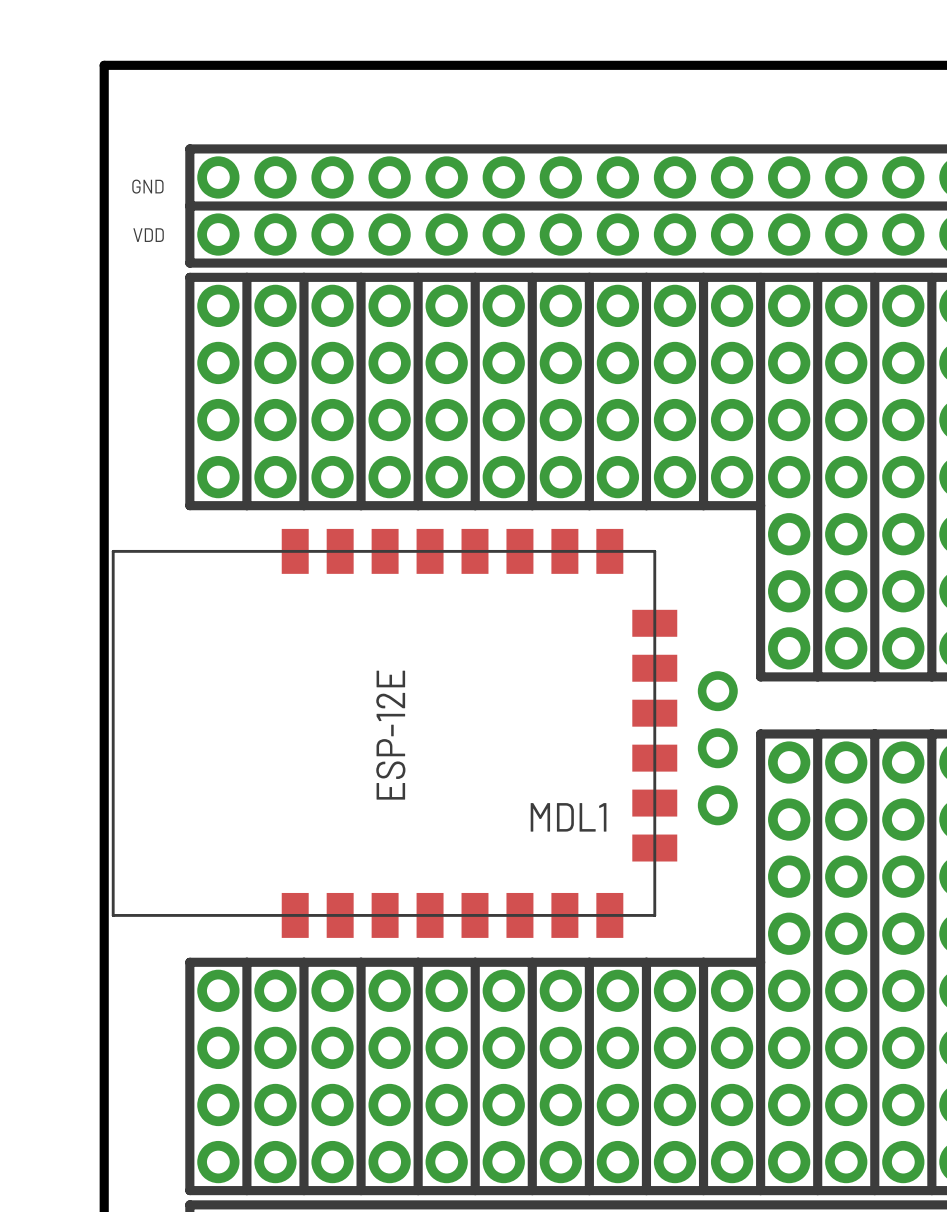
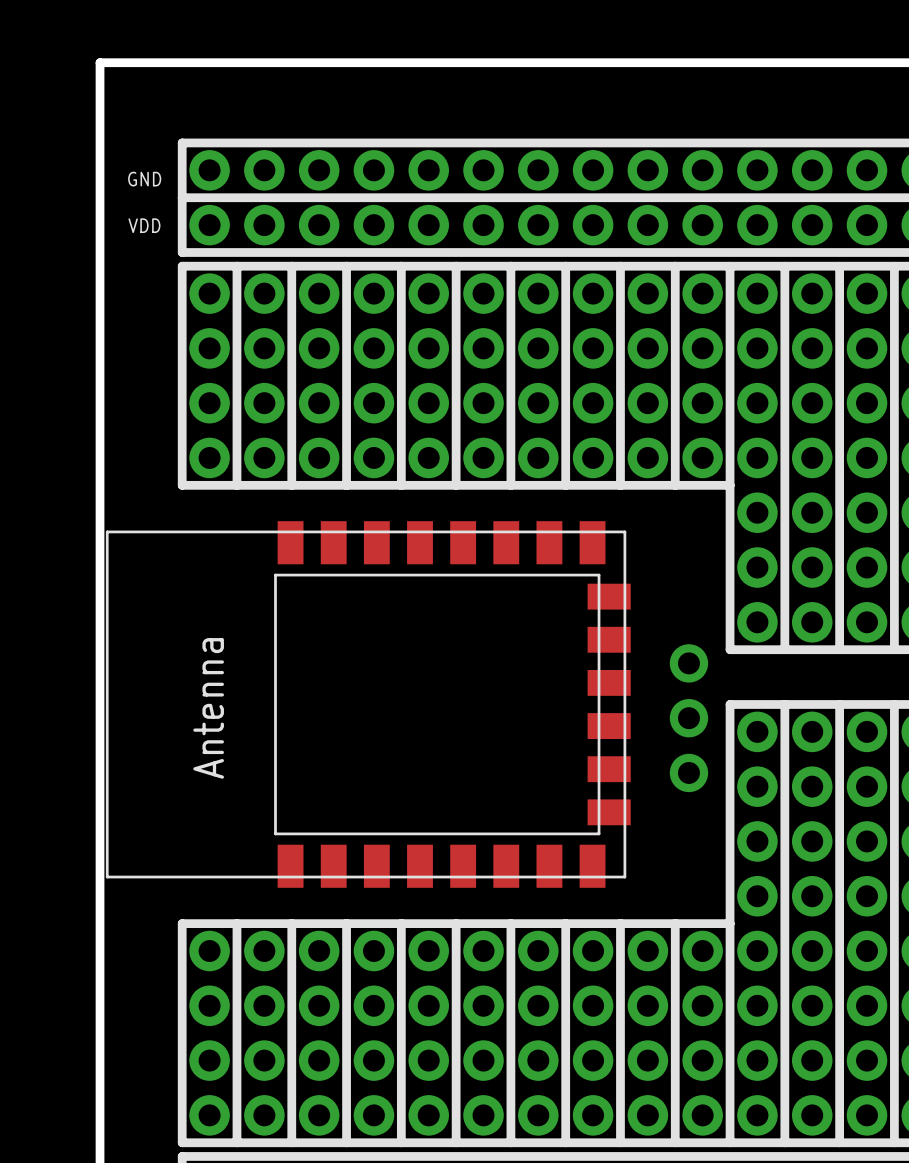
part: none -> (368, 704)
MDL1: (394, 733) -> none

